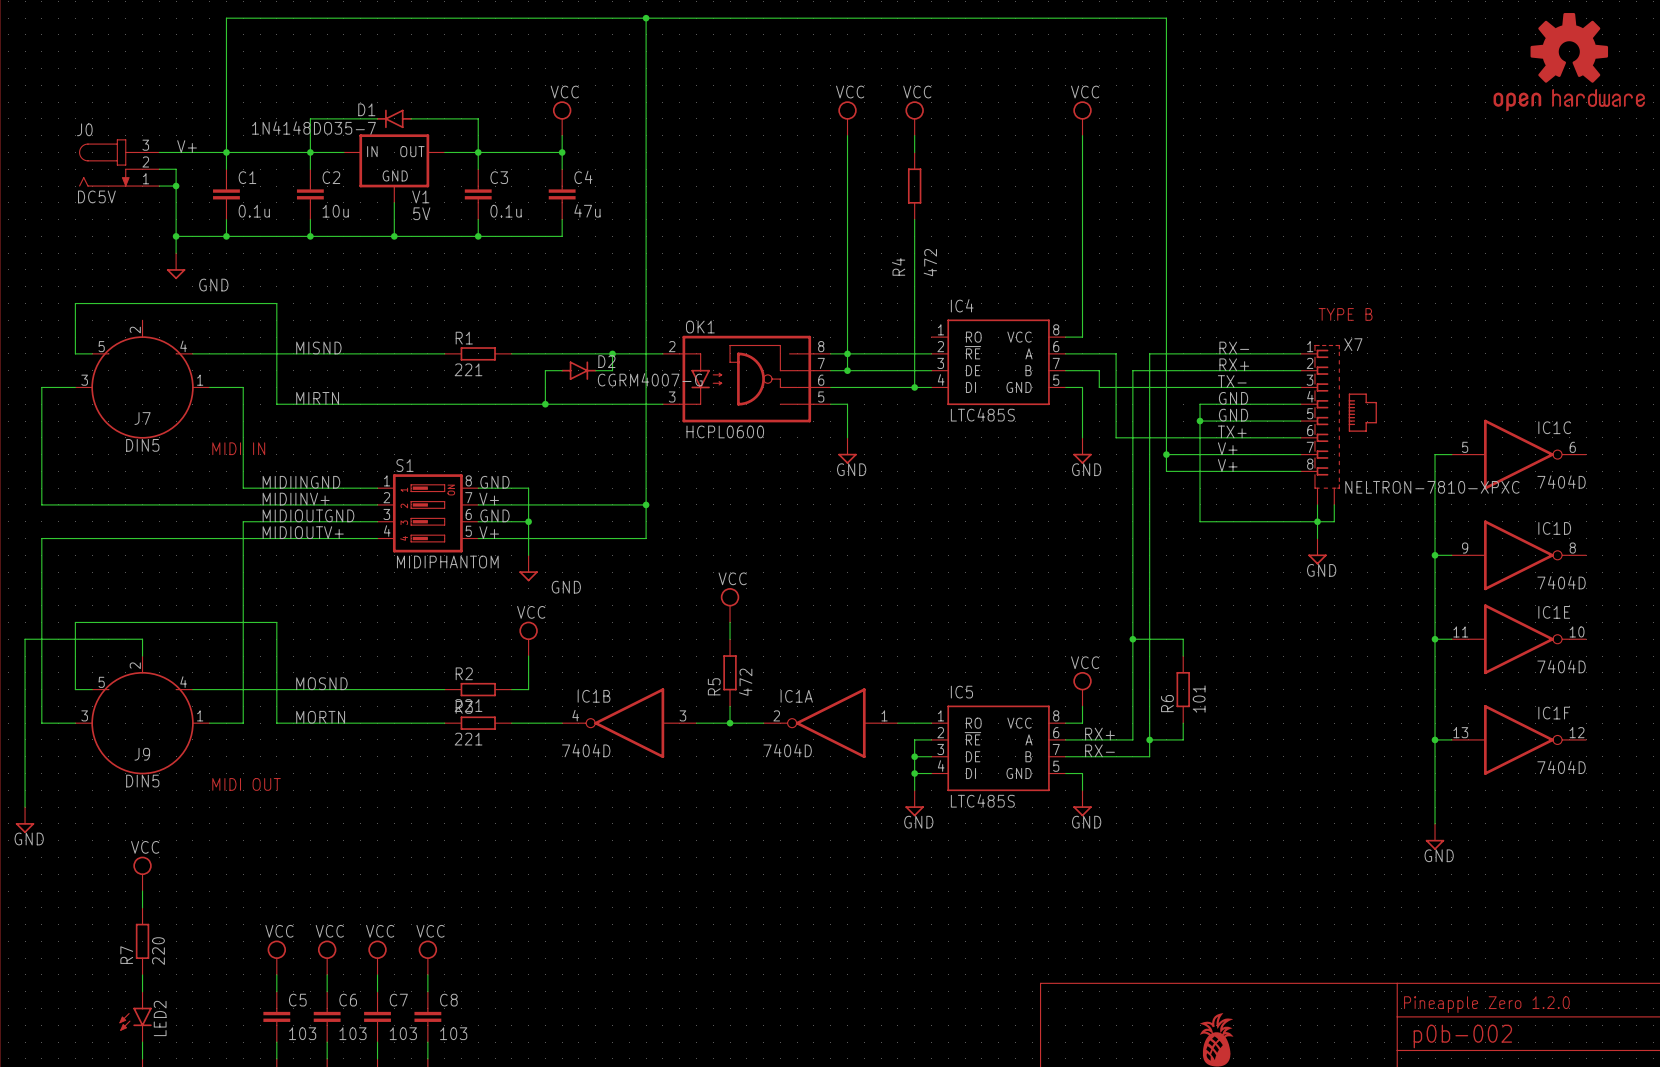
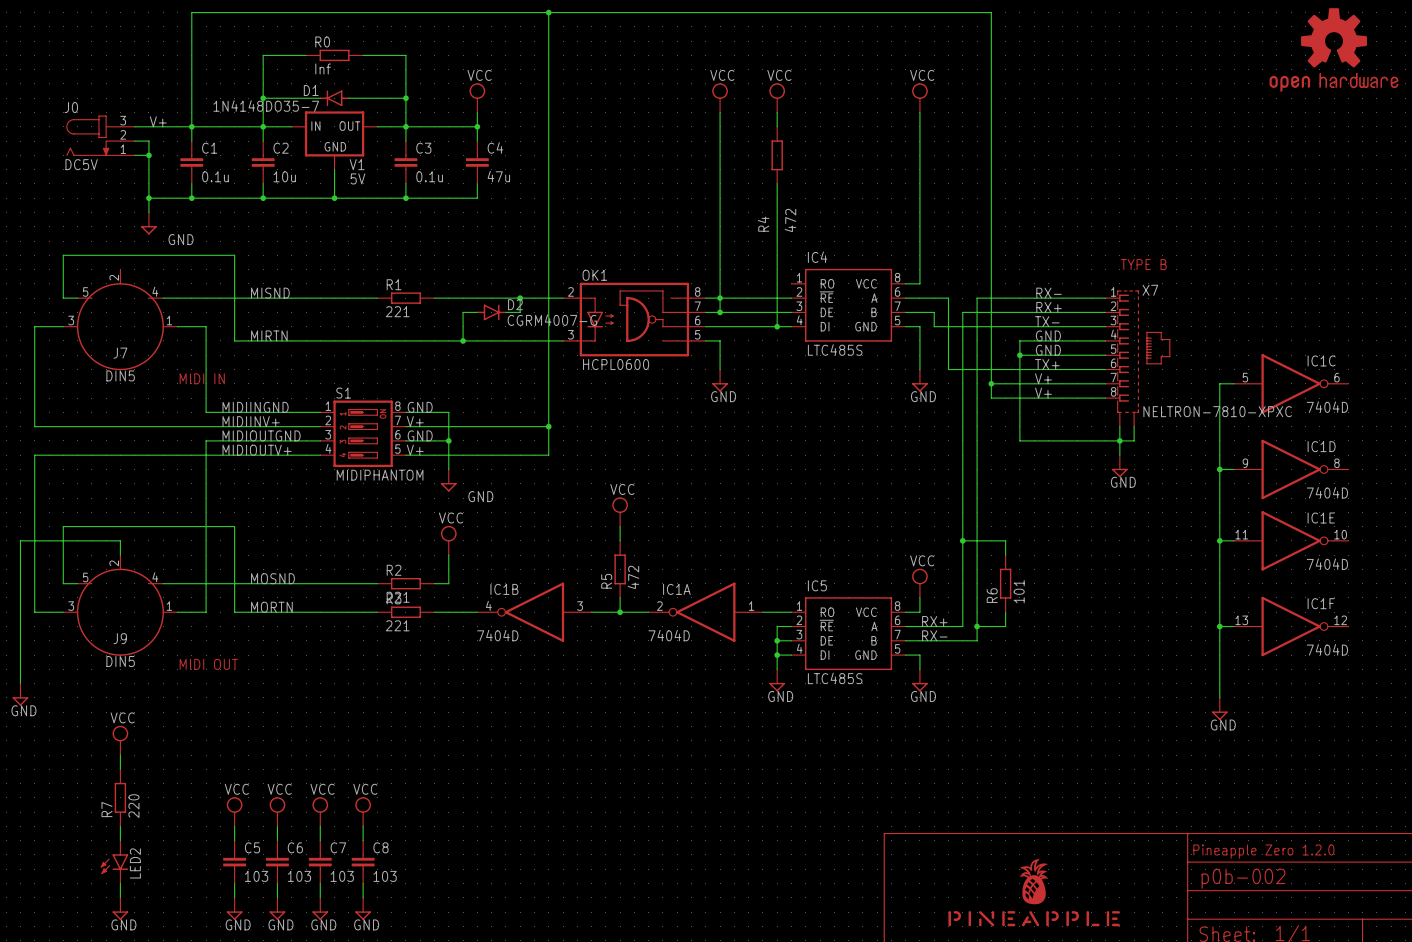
wire: none -> (306, 55) (263, 55) (263, 98)
R0: none -> Inf (334, 55)
wire: none -> (363, 55) (405, 55) (405, 98)
junction: none -> (263, 98)
junction: none -> (405, 98)

